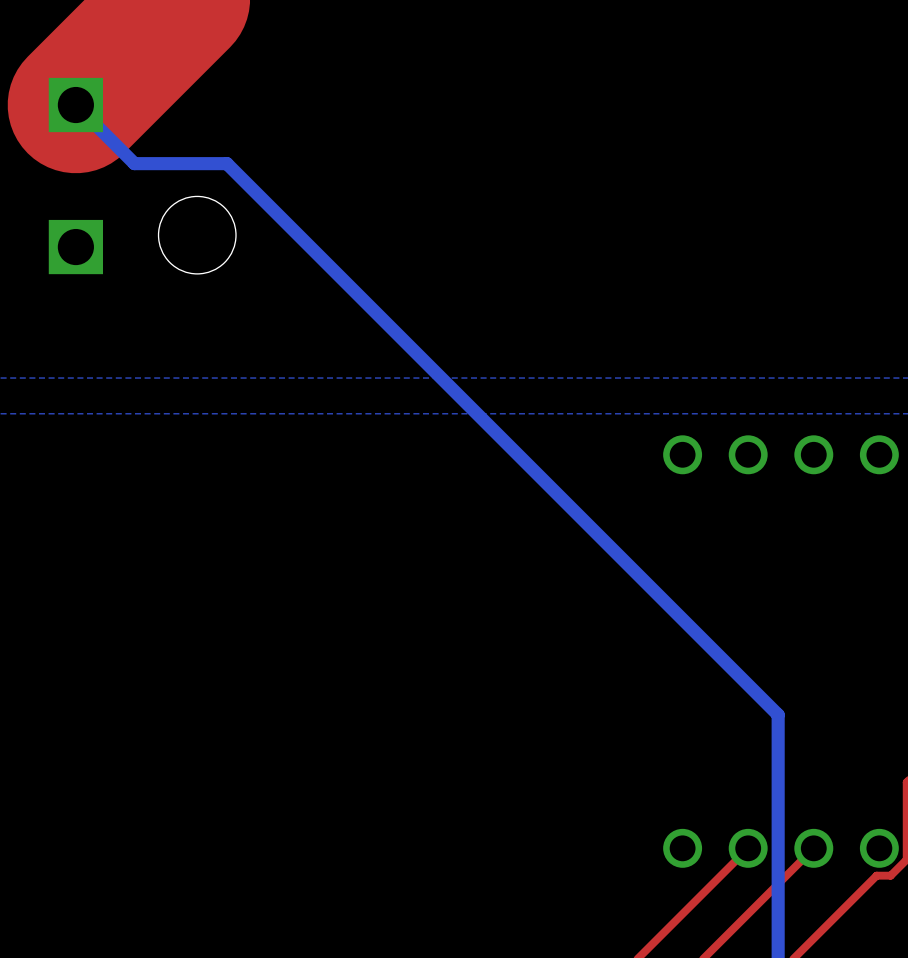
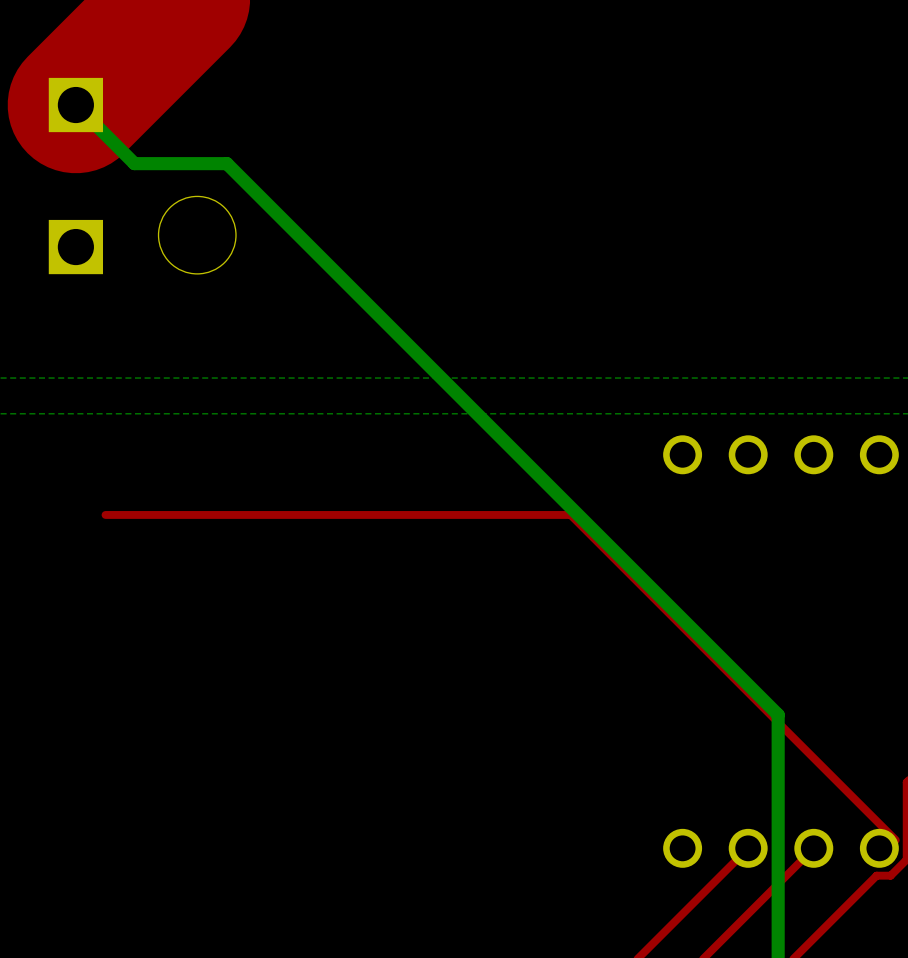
top track: none -> (105, 514) (570, 514) (895, 840)

